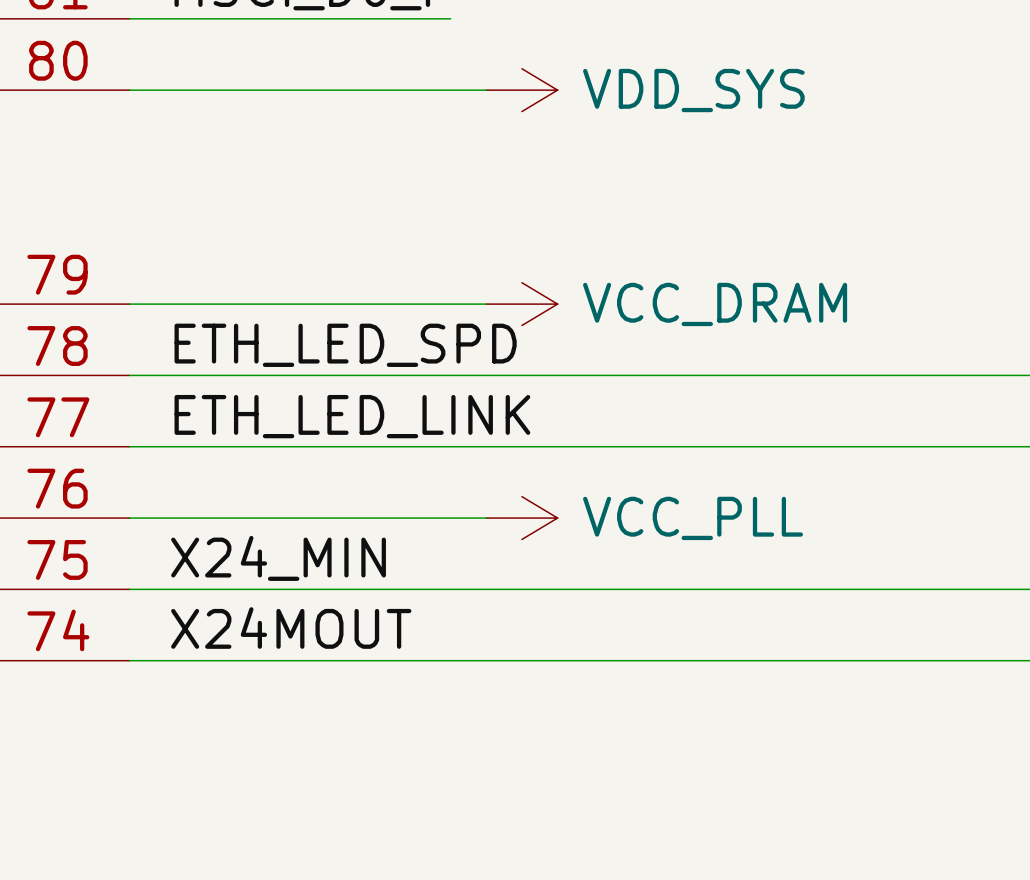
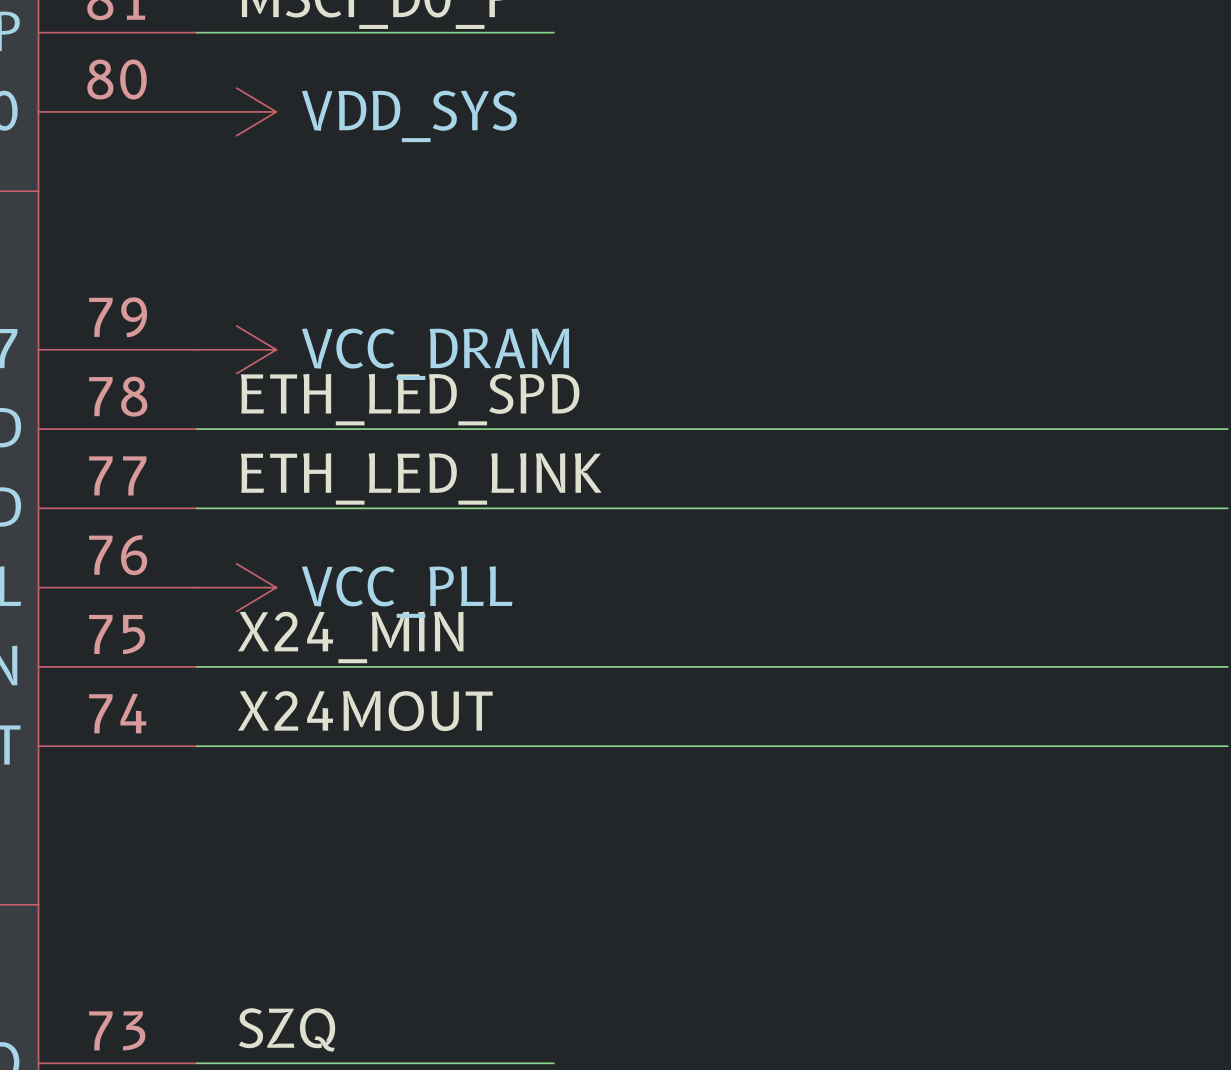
wire: (129, 90) (486, 90) -> none
power symbol position: VDD_SYS (521, 90) -> VDD_SYS (236, 111)
wire: (129, 304) (486, 304) -> none
power symbol position: VCC_DRAM (521, 304) -> VCC_DRAM (236, 349)
wire: (129, 518) (486, 518) -> none
power symbol position: VCC_PLL (521, 518) -> VCC_PLL (236, 587)

